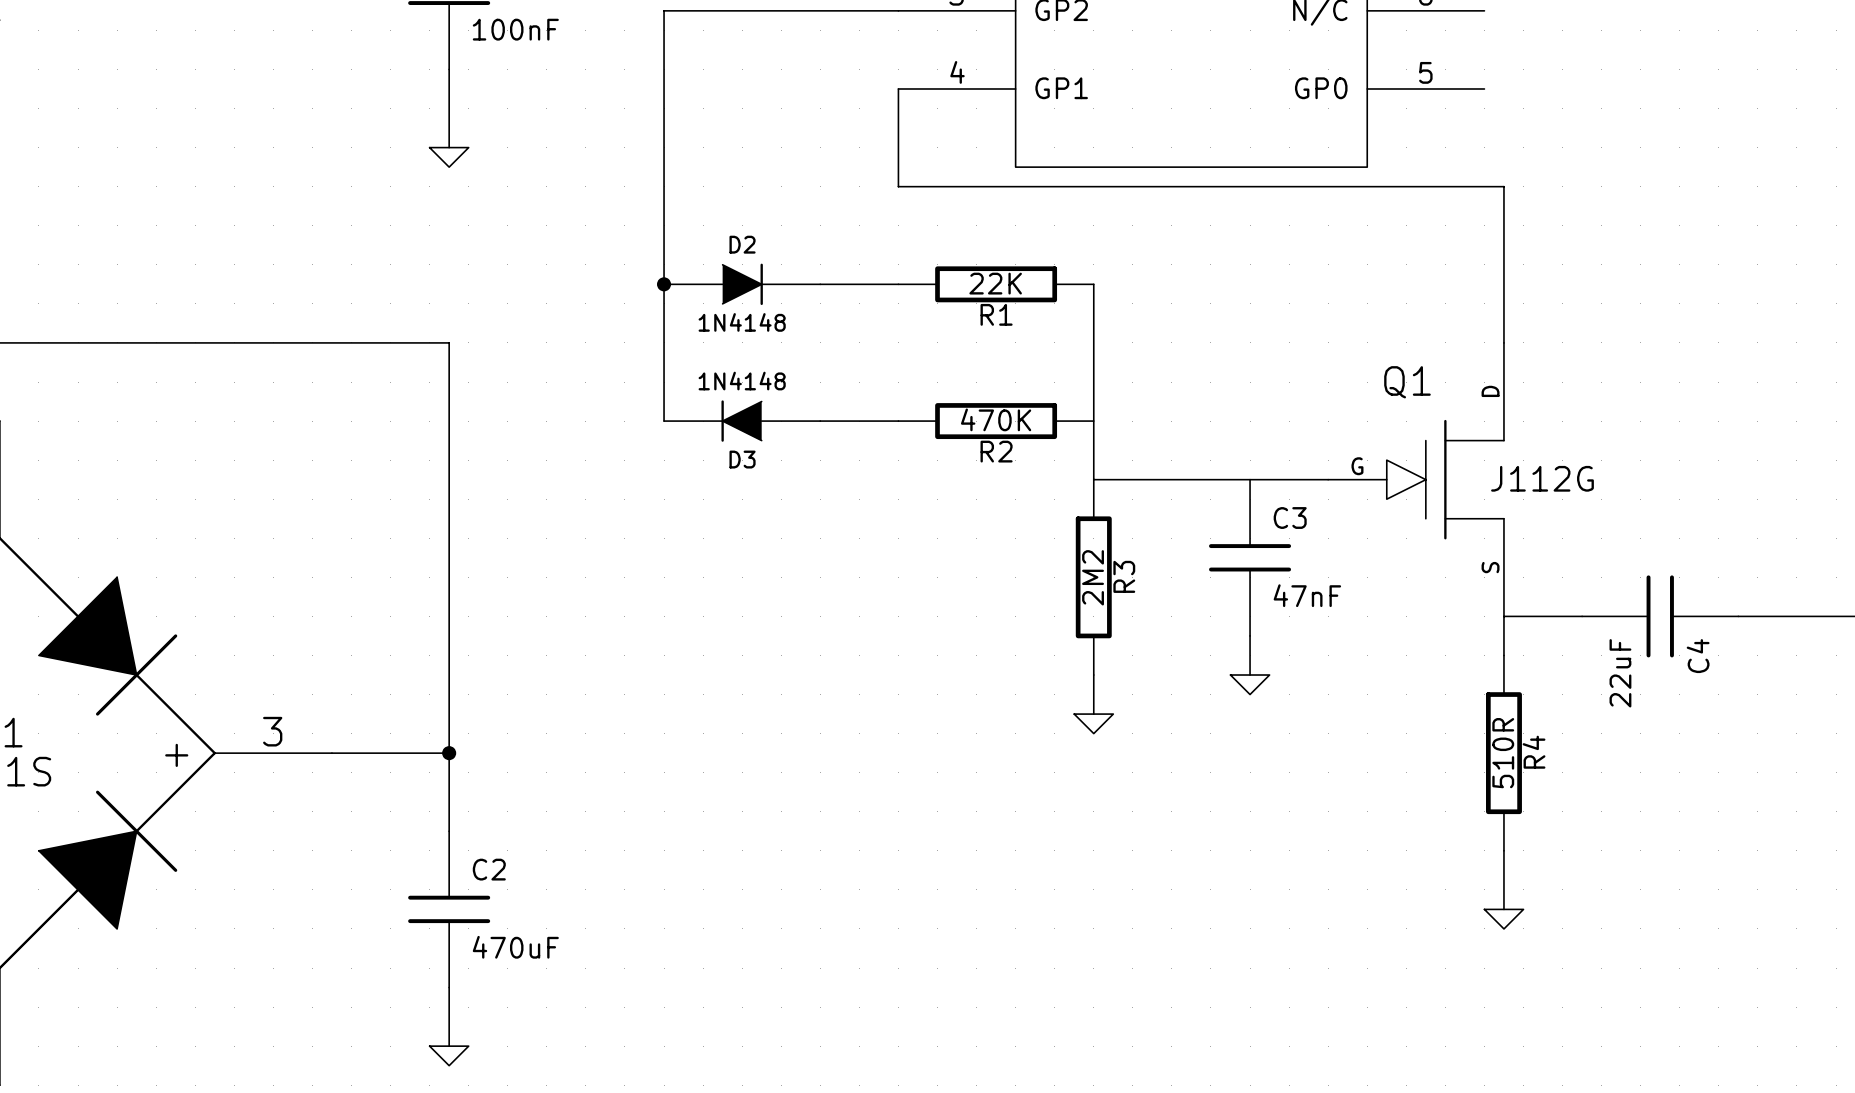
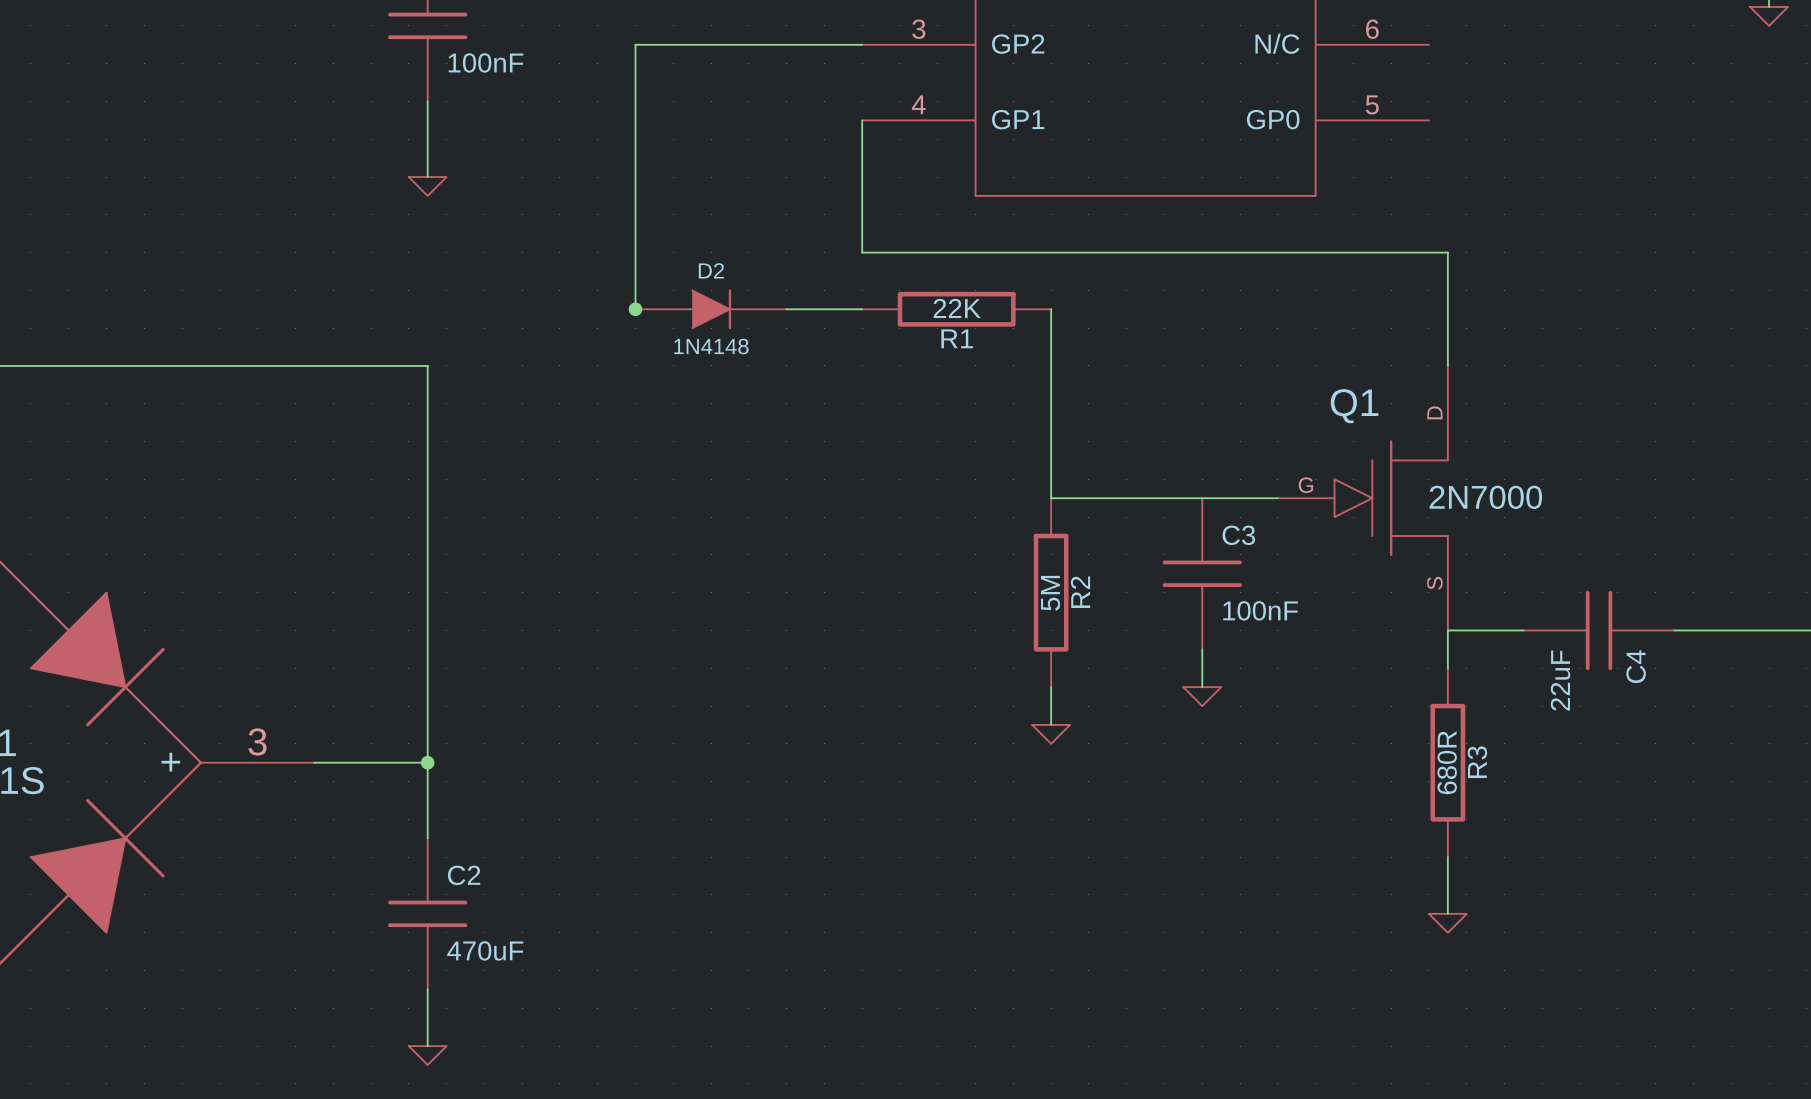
wire: (898, 186) (1503, 186) (1503, 225) -> (862, 214) (862, 252) (1447, 252)
wire: (664, 284) (664, 421) -> none
D3: 1N4148 (742, 421) -> none
wire: (820, 421) (898, 421) -> none
R2: 470K (996, 421) -> none
Q1 value: J112G (1542, 478) -> 2N7000 (1485, 497)
R3 name: R3 (1124, 576) -> R2 (1080, 592)
R3 value: 2M2 (1093, 577) -> 5M (1050, 593)
C3 value: 47nF (1307, 595) -> 100nF (1260, 610)
R4 name: R4 (1534, 752) -> R3 (1477, 762)
R4 value: 510R (1503, 753) -> 680R (1447, 762)

